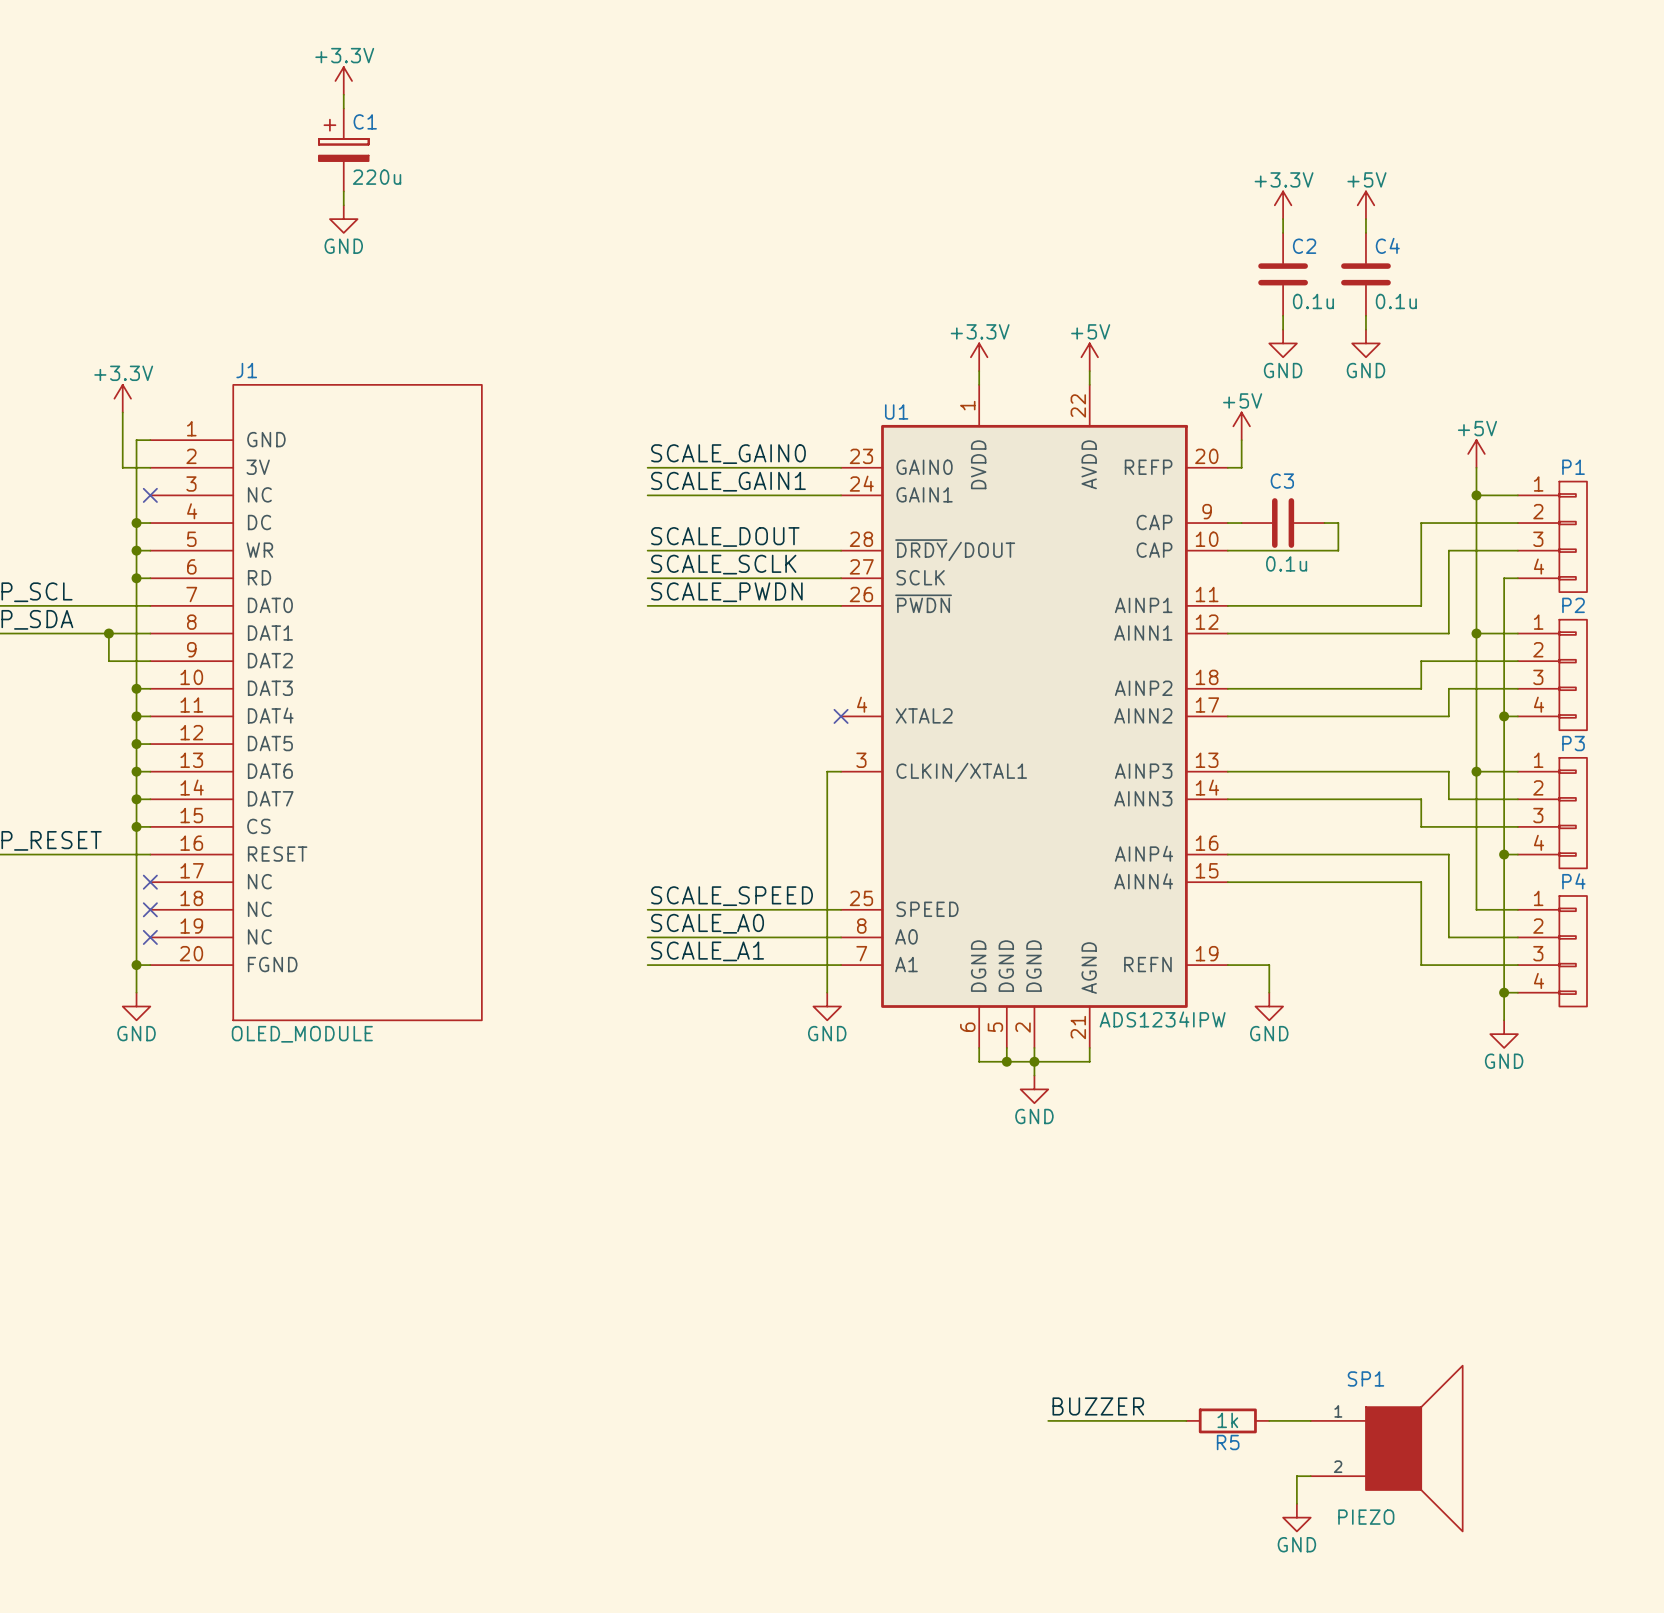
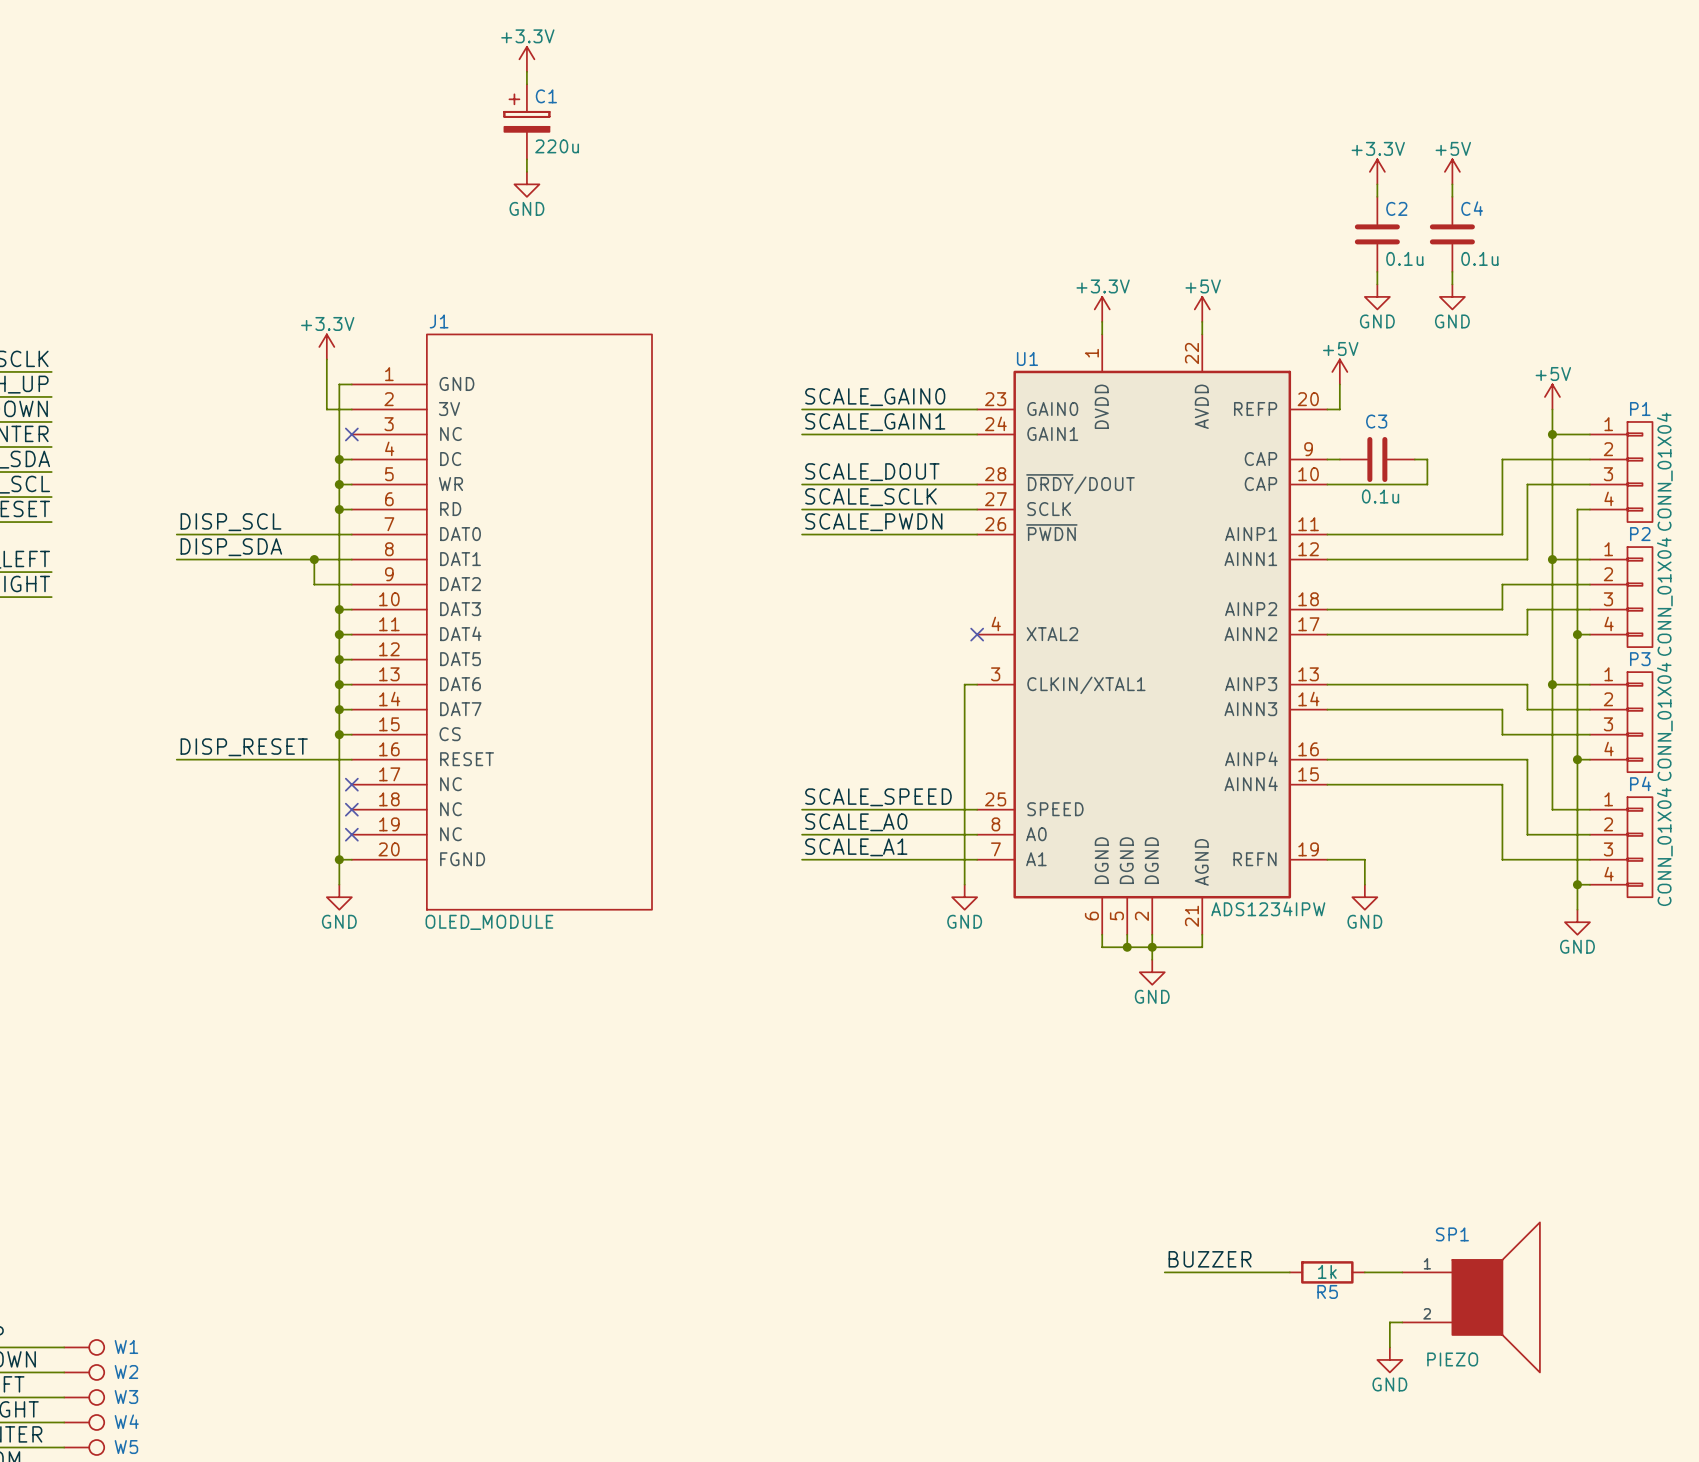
P1 value: none -> CONN_01X04 (1664, 471)
P2 value: none -> CONN_01X04 (1664, 596)
P3 value: none -> CONN_01X04 (1664, 721)
P4 value: none -> CONN_01X04 (1664, 846)

